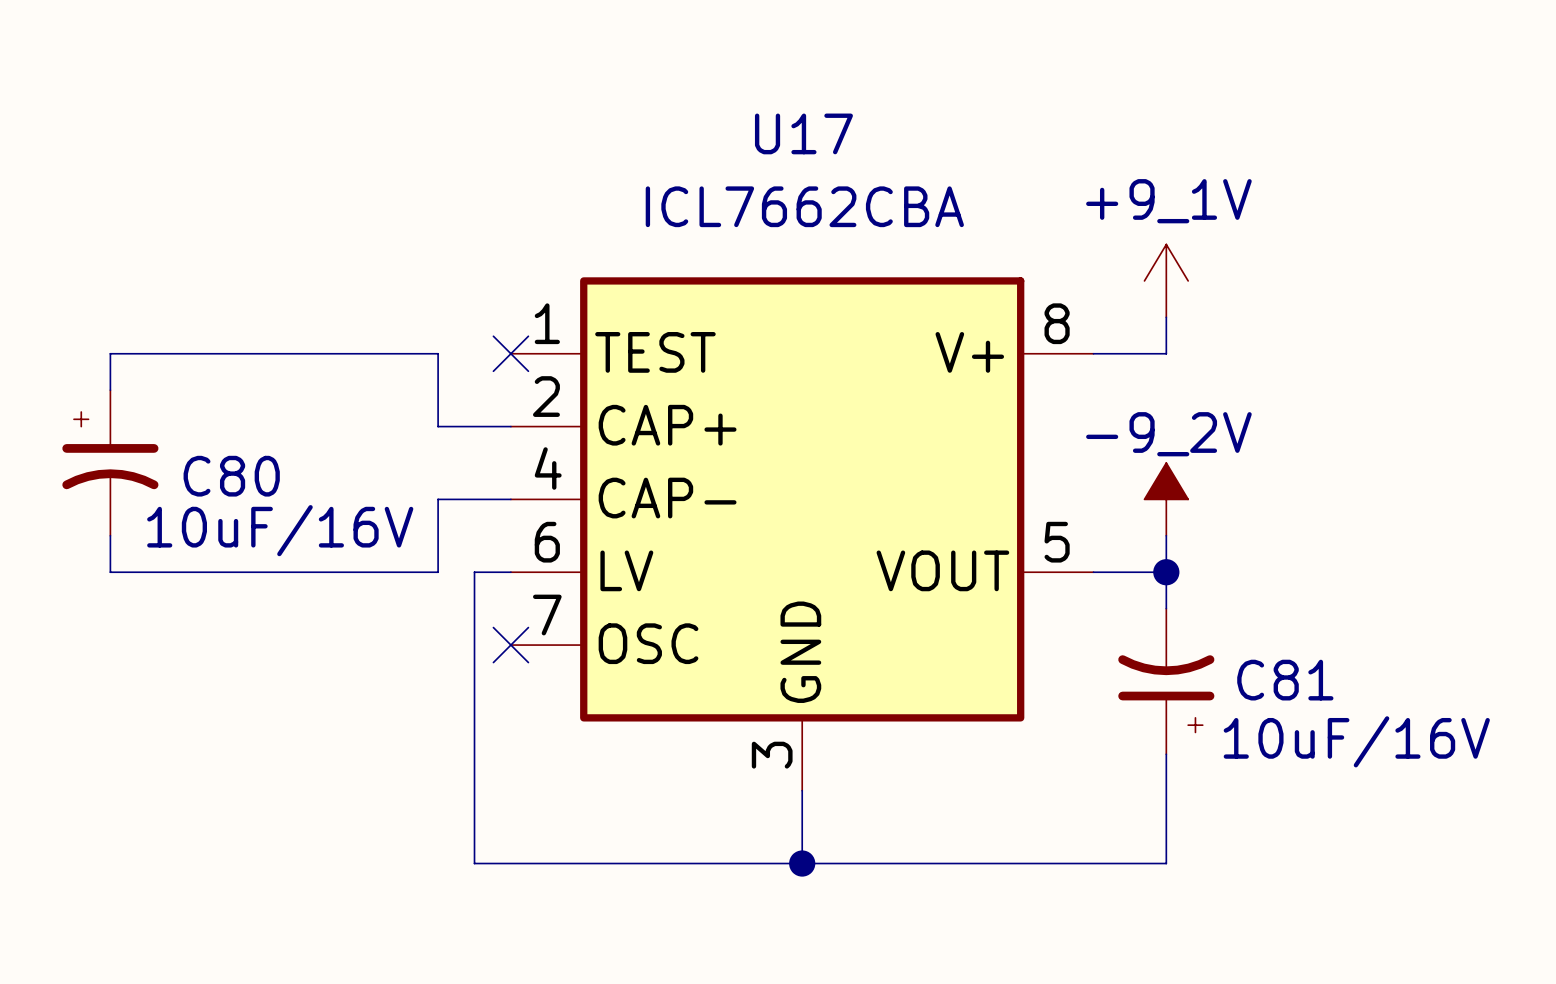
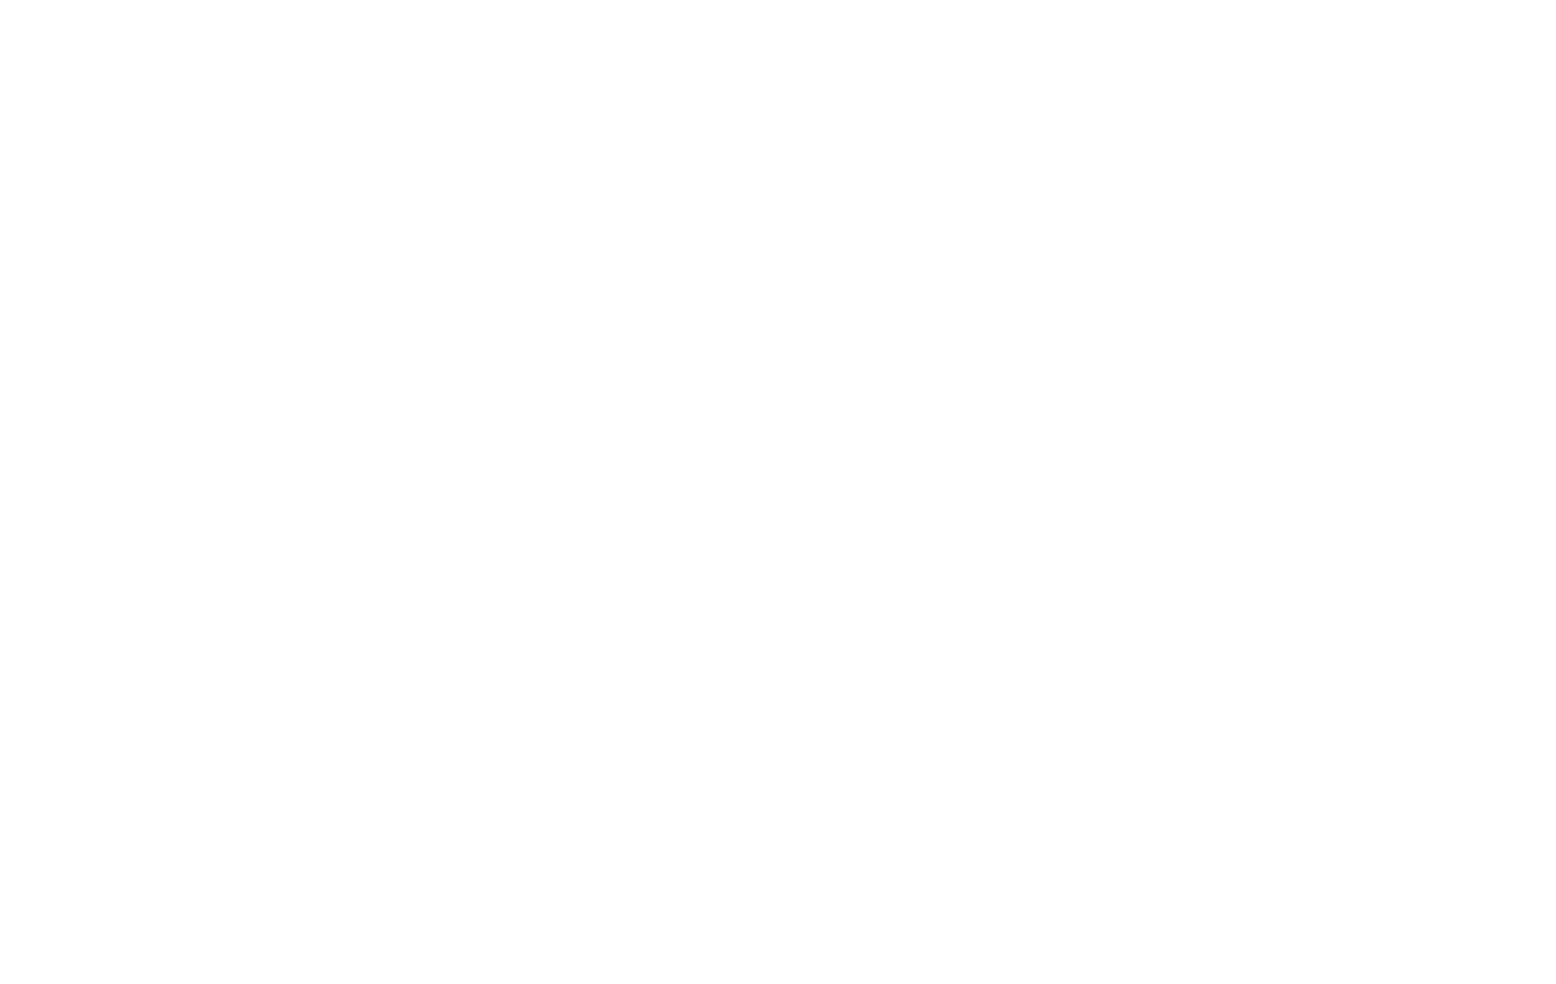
power symbol: +9_1V (1166, 280) -> none
wire: (1166, 317) (1166, 353) (1093, 353) -> none
no-connect mark: (510, 353) -> none
wire: (110, 390) (110, 353) (438, 353) (438, 426) (510, 426) -> none
C80: 10uF/16V (110, 462) -> none
wire: (510, 499) (438, 499) (438, 572) (110, 572) (110, 535) -> none
power symbol: -9_2V (1166, 499) -> none
U17: ICL7662CBA (802, 533) -> none
wire: (1166, 535) (1166, 608) -> none
wire: (510, 572) (474, 572) (474, 863) (1166, 863) (1166, 754) -> none
wire: (1093, 572) (1166, 572) -> none
junction: (1166, 572) -> none
no-connect mark: (510, 645) -> none
C81: 10uF/16V (1166, 681) -> none
wire: (802, 790) (802, 863) -> none
junction: (802, 863) -> none

